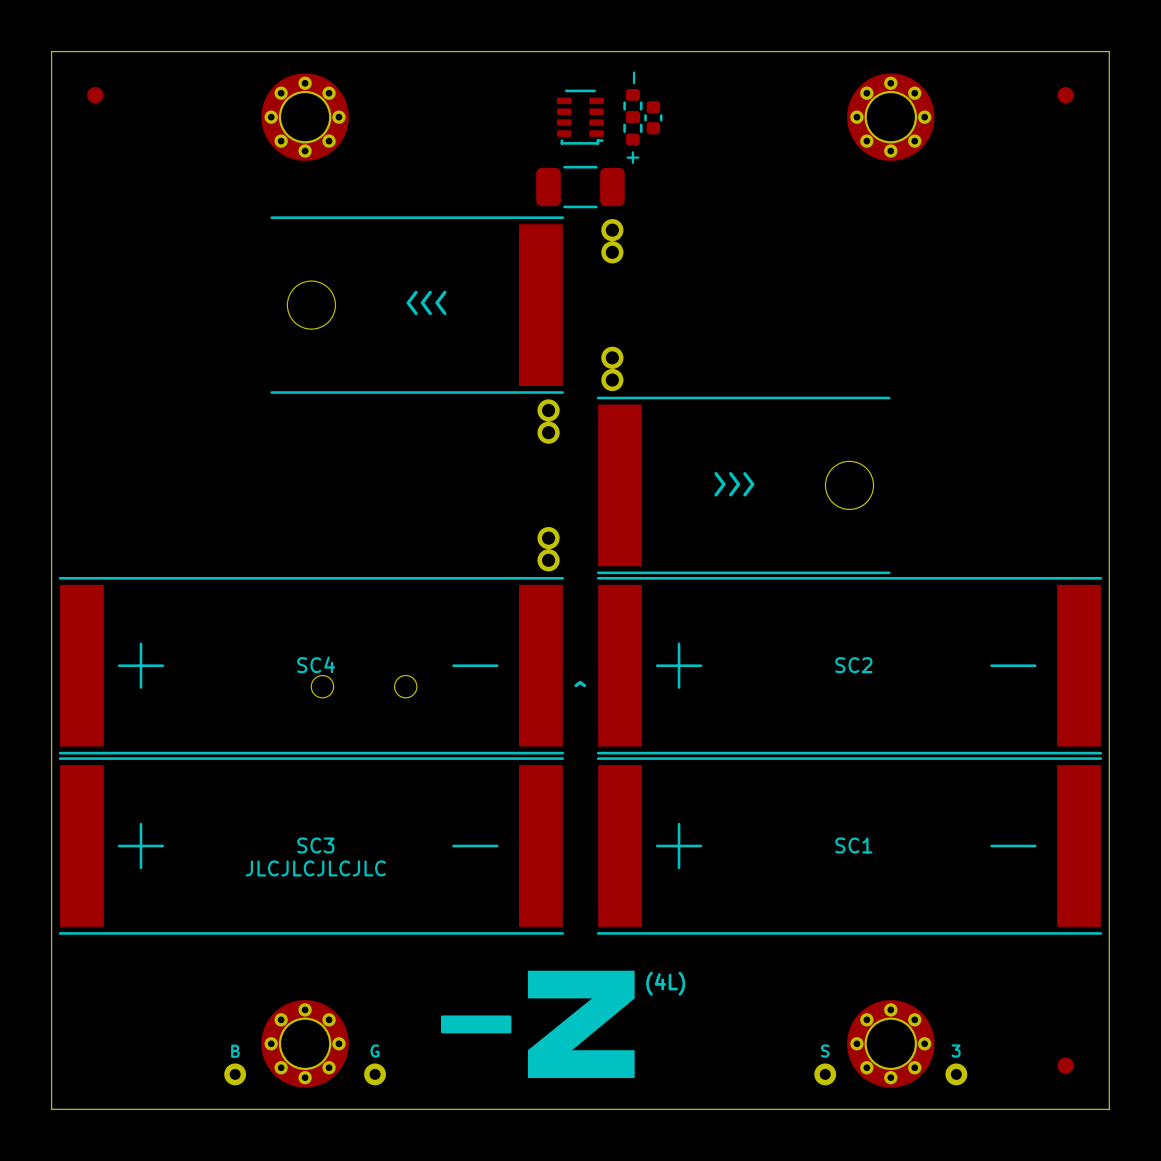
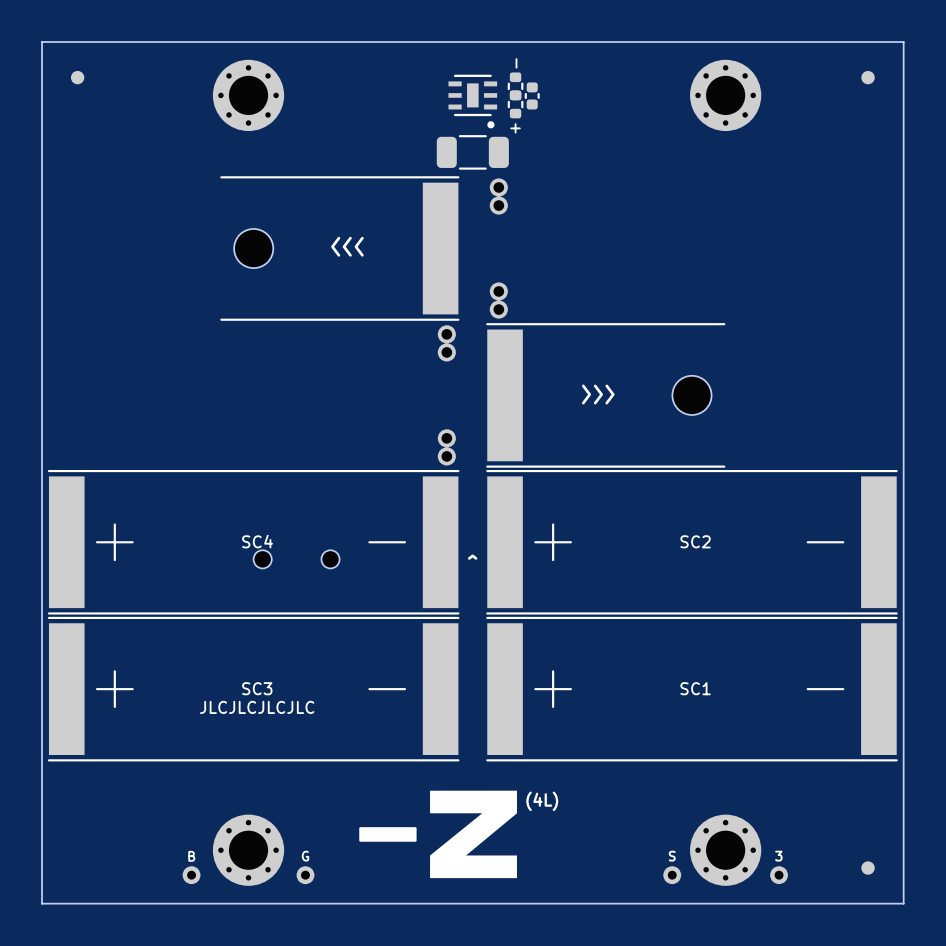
part footprint: [556, 89, 604, 145] -> [448, 74, 498, 129]

